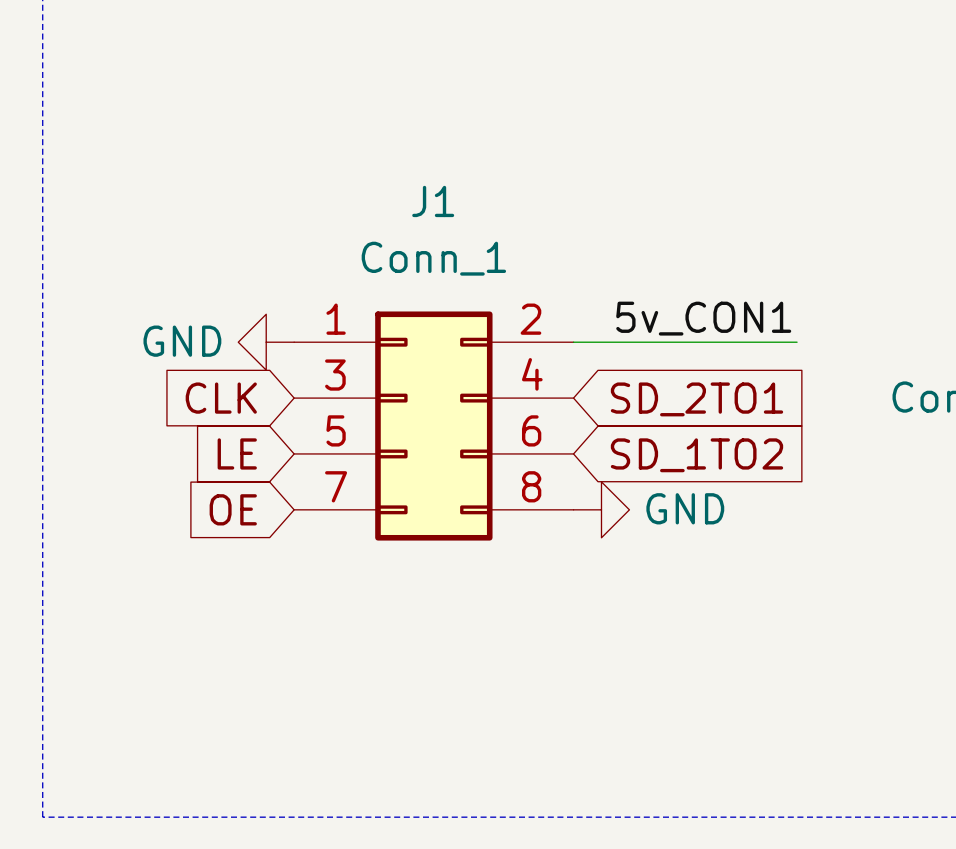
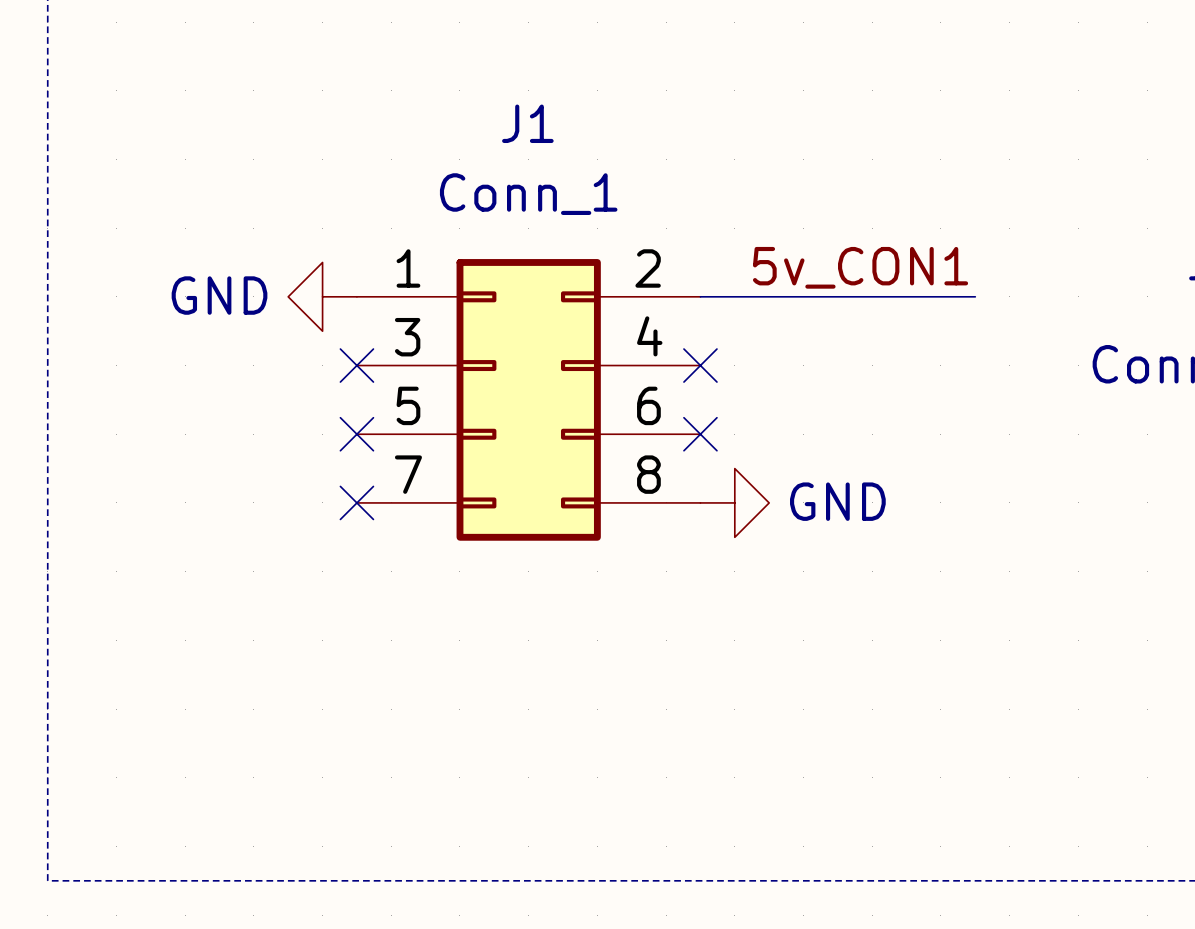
global label: CLK (221, 398) -> none
no-connect mark: none -> (356, 365)
no-connect mark: none -> (700, 365)
global label: SD_2TO1 (696, 399) -> none
global label: LE (237, 453) -> none
no-connect mark: none -> (356, 434)
no-connect mark: none -> (700, 434)
global label: SD_1TO2 (696, 455) -> none
global label: OE (233, 509) -> none
no-connect mark: none -> (356, 502)

